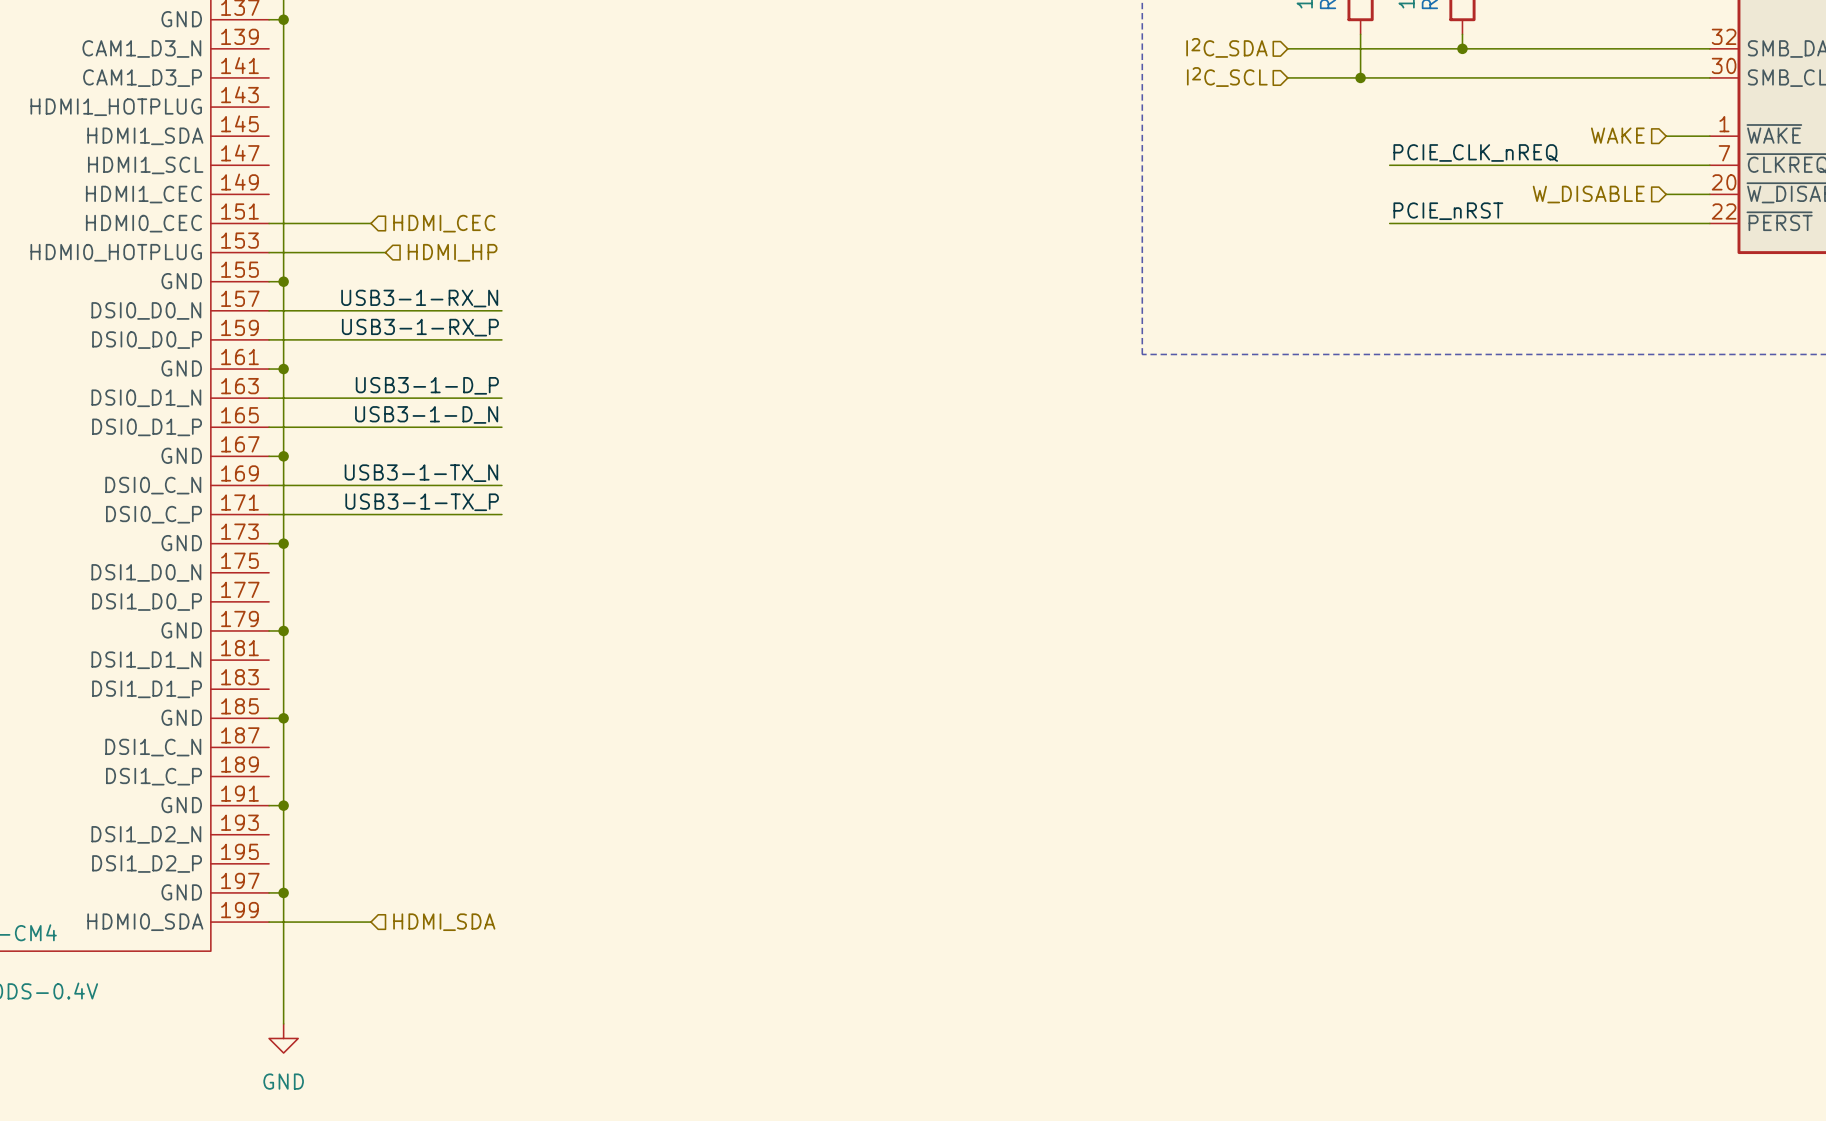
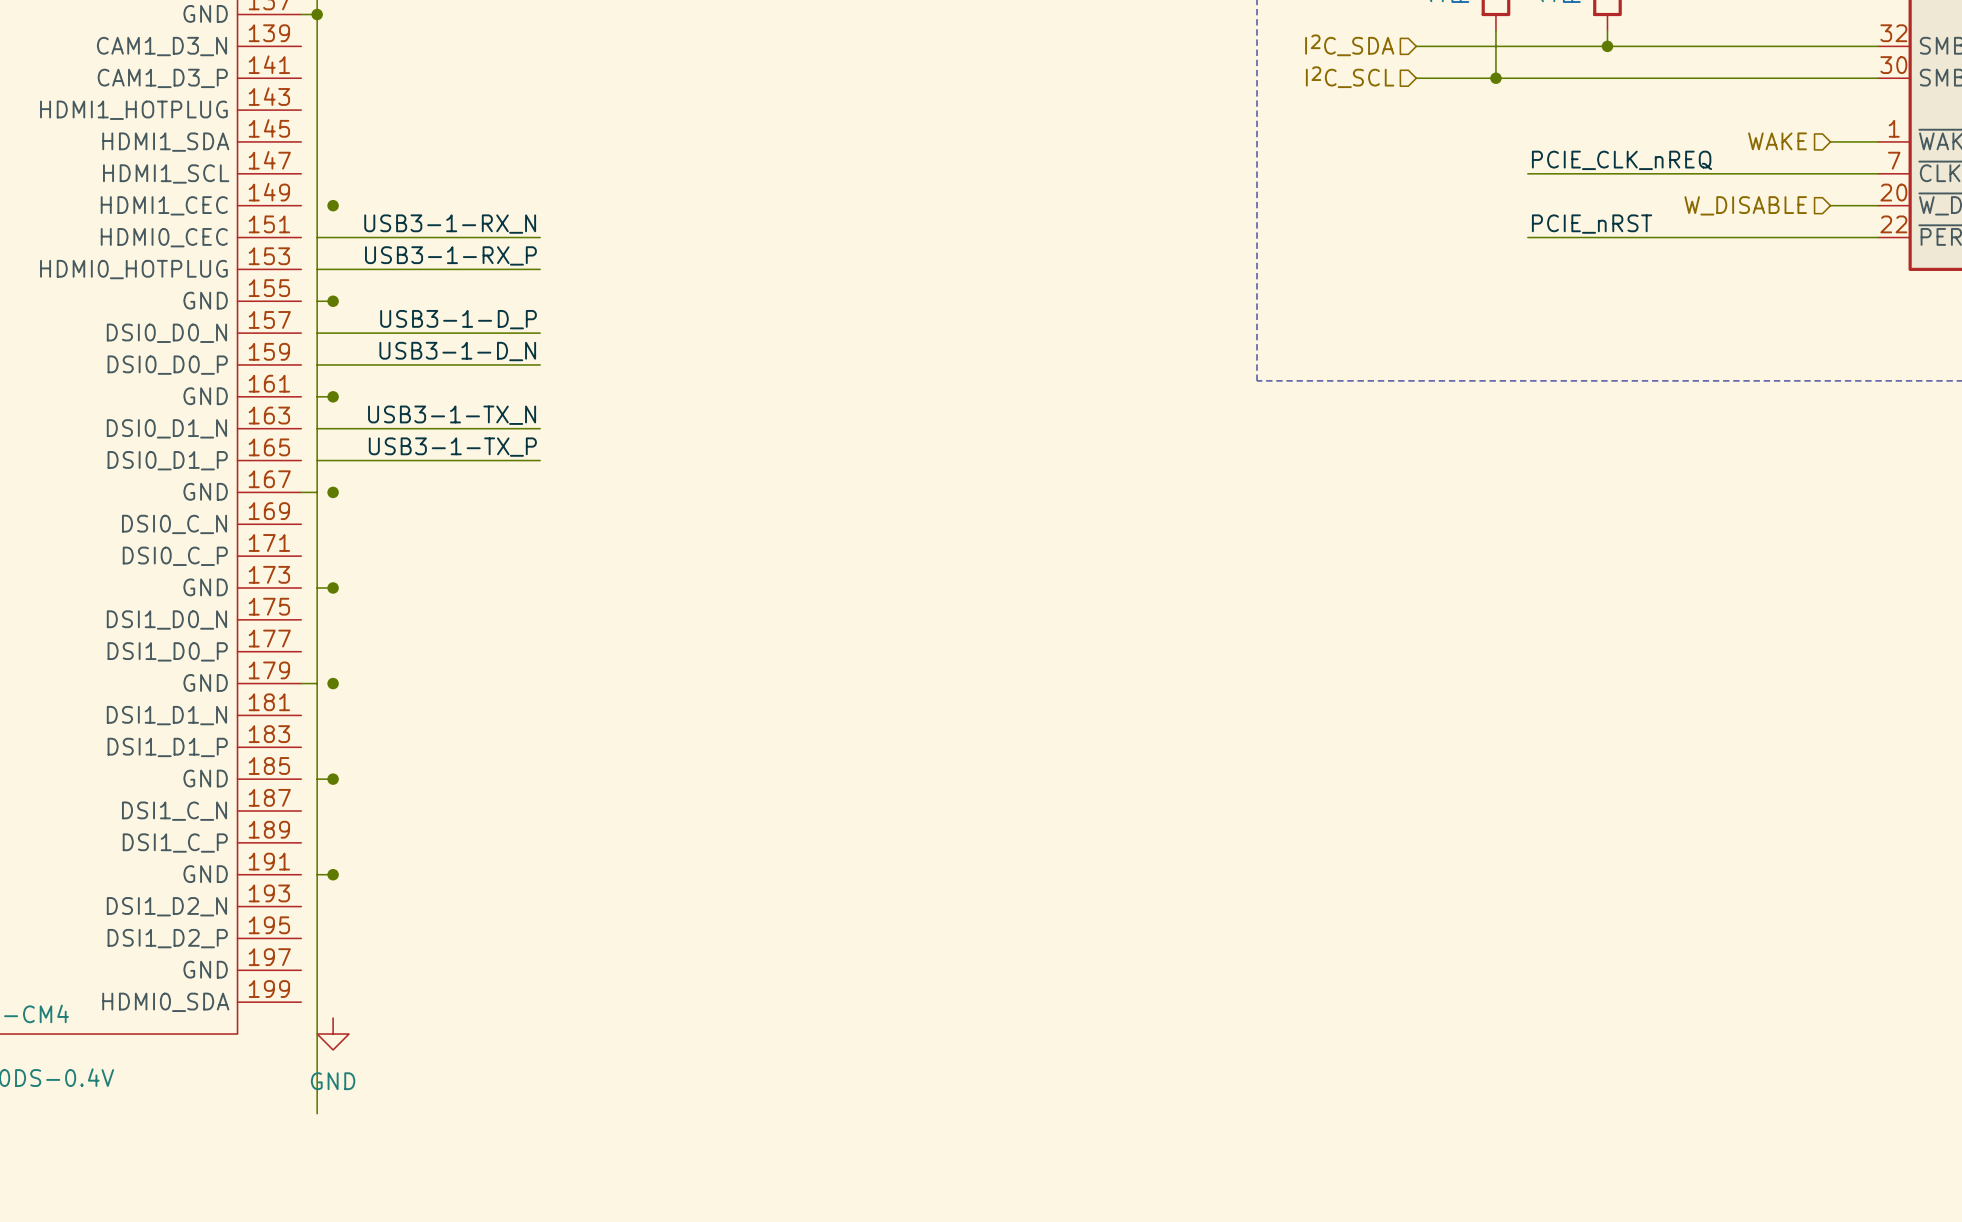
junction: none -> (333, 205)
wire: (269, 223) (283, 223) -> none
wire: none -> (412, 237) (540, 237)
hierarchical label: HDMI_CEC (444, 223) -> none
wire: (269, 252) (283, 252) -> none
wire: none -> (428, 269) (540, 269)
hierarchical label: HDMI_HP (452, 252) -> none
wire: (269, 281) (283, 281) -> (333, 301) (317, 301)
junction position: (283, 281) -> (333, 301)
label position: USB3-1-RX_N (419, 298) -> USB3-1-RX_N (450, 224)
wire: (269, 310) (283, 310) -> none
wire: (487, 310) (501, 310) -> none
label position: USB3-1-RX_P (420, 327) -> USB3-1-RX_P (450, 255)
wire: (269, 339) (283, 339) -> none
wire: (487, 339) (501, 339) -> none
wire: (269, 369) (283, 369) -> (333, 396) (317, 396)
junction position: (283, 369) -> (333, 396)
label position: USB3-1-D_P (427, 385) -> USB3-1-D_P (458, 319)
wire: (269, 398) (283, 398) -> none
wire: (487, 398) (501, 398) -> none
label position: USB3-1-D_N (426, 414) -> USB3-1-D_N (457, 351)
wire: (269, 427) (283, 427) -> none
wire: (487, 427) (501, 427) -> none
junction position: (283, 456) -> (333, 492)
label position: USB3-1-TX_N (421, 473) -> USB3-1-TX_N (452, 415)
wire: (269, 485) (501, 485) -> none
label position: USB3-1-TX_P (422, 502) -> USB3-1-TX_P (452, 447)
wire: (269, 514) (501, 514) -> none
wire: (269, 543) (283, 543) -> (333, 587) (317, 587)
junction position: (283, 543) -> (333, 587)
junction position: (283, 630) -> (333, 683)
wire: (269, 718) (283, 718) -> (333, 779) (317, 779)
junction position: (283, 718) -> (333, 779)
wire: (269, 805) (283, 805) -> (333, 874) (317, 874)
junction position: (283, 805) -> (333, 874)
wire: (269, 892) (283, 892) -> none
junction: (283, 892) -> none
wire: (269, 922) (370, 922) -> none
hierarchical label: HDMI_SDA (444, 922) -> none
power symbol position: GND (283, 1038) -> GND (333, 1034)

